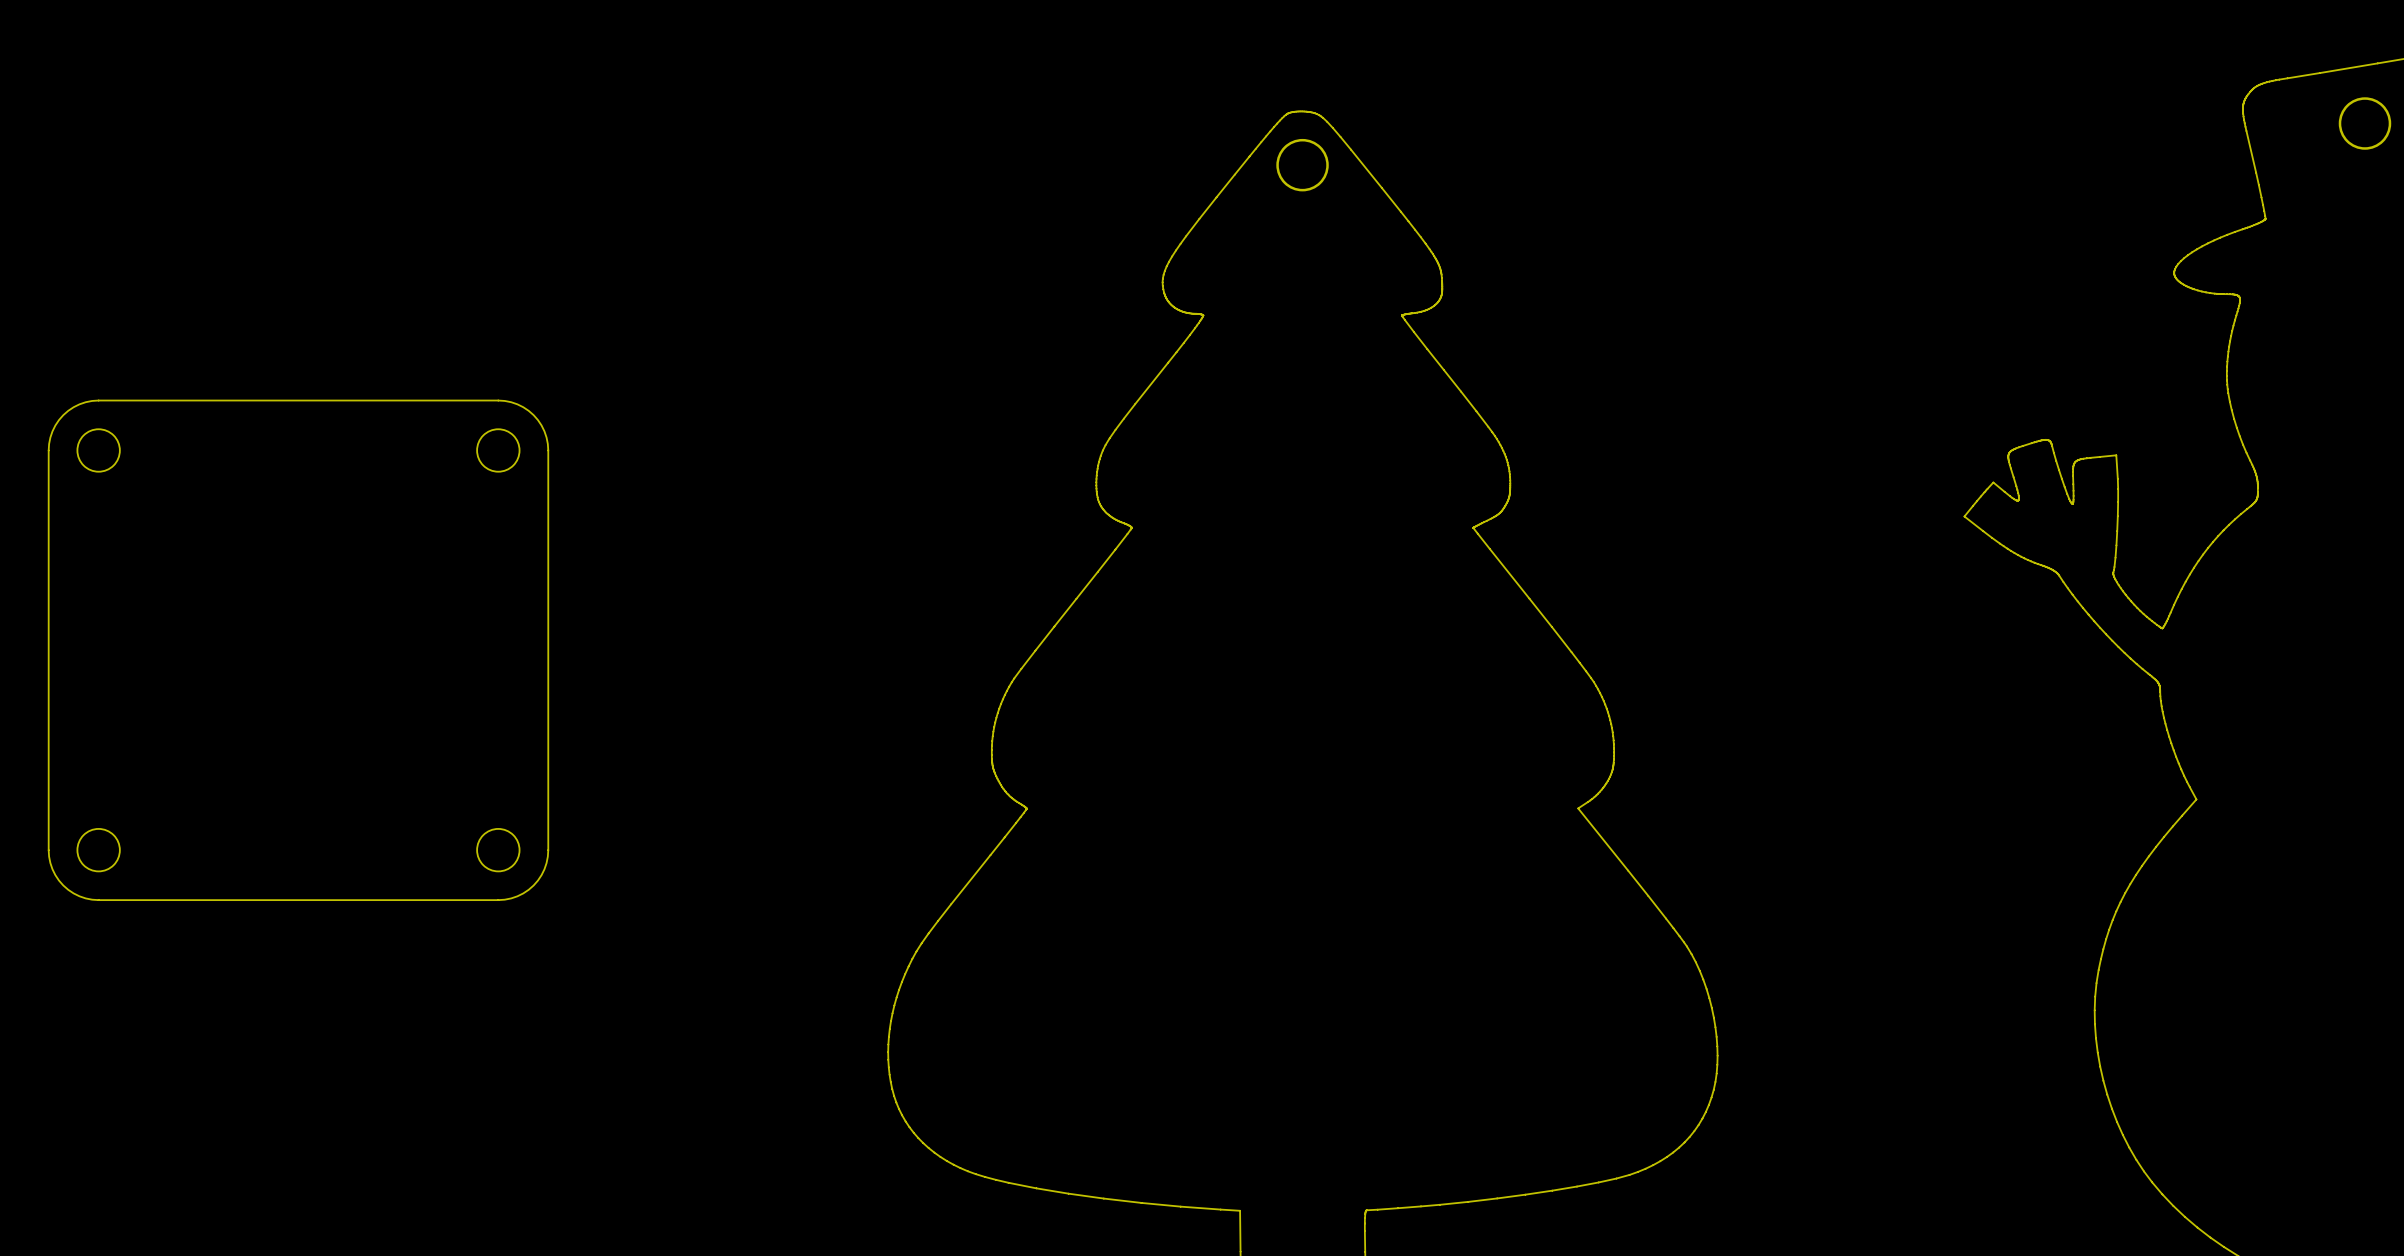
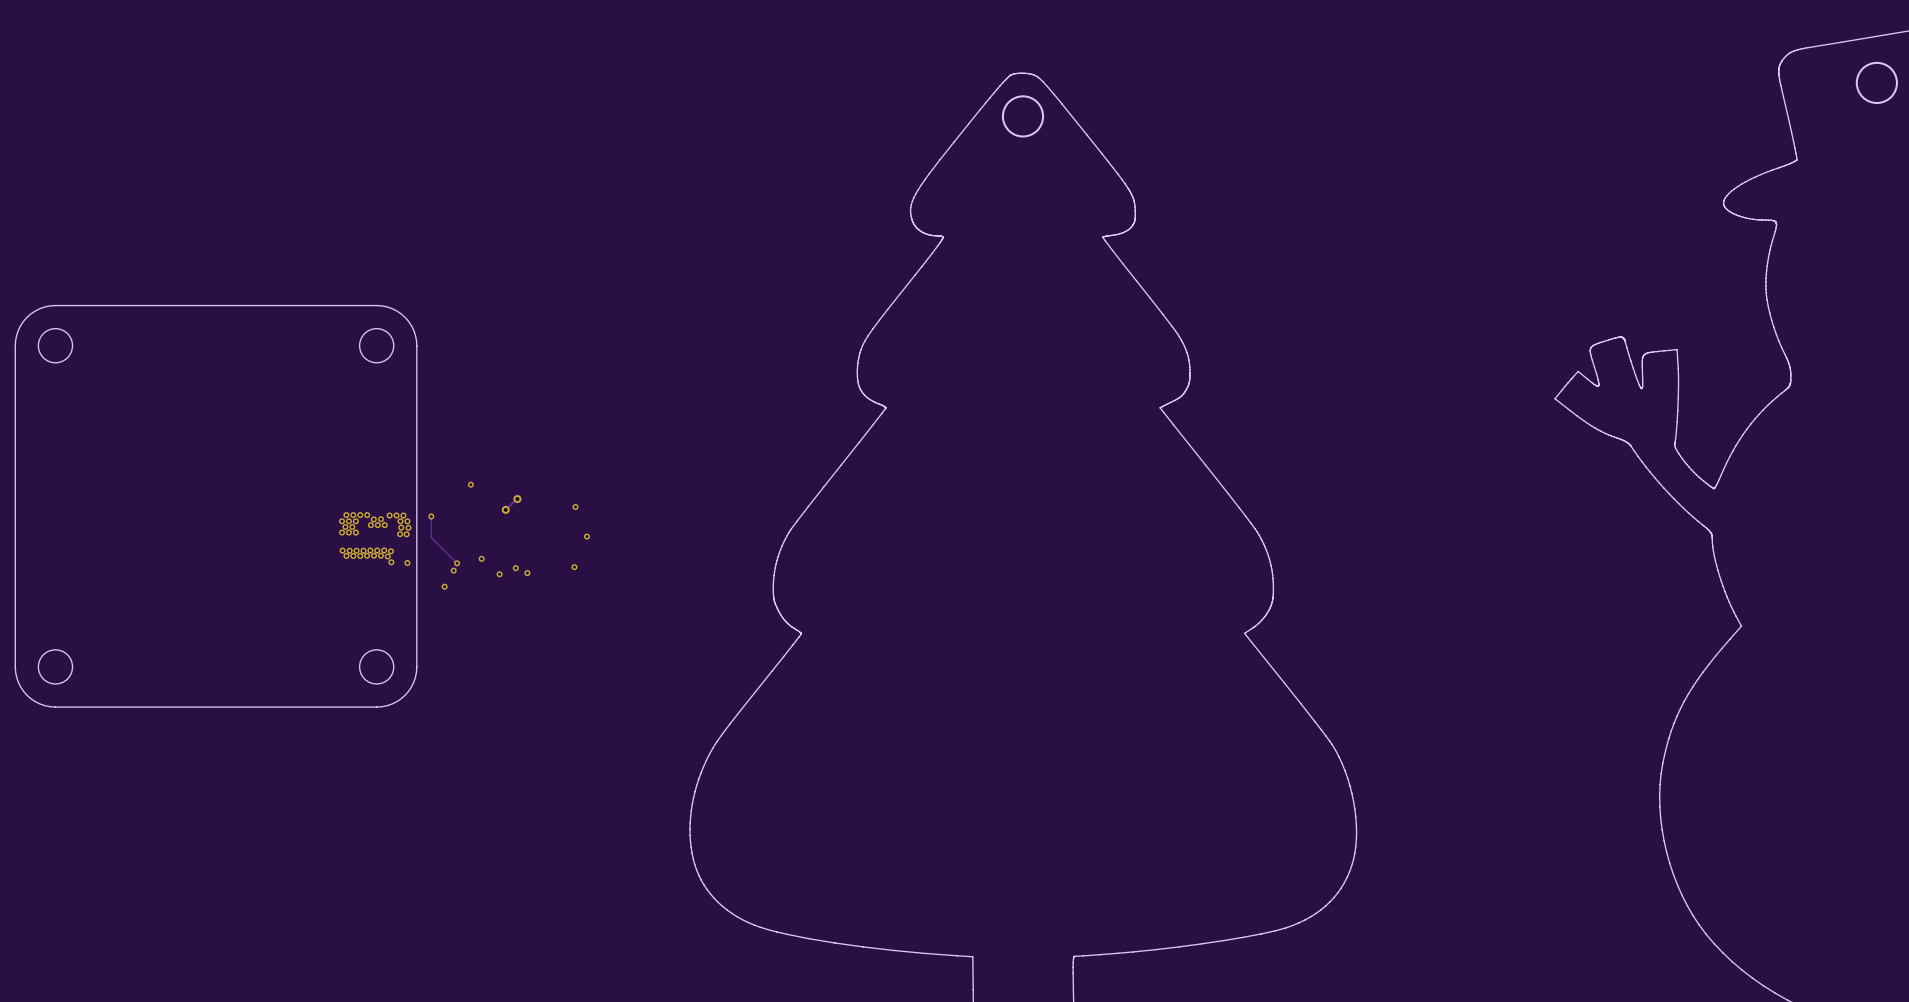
via: none -> (470, 484)
track: none -> (517, 499) (505, 509)
via: none -> (517, 499)
via: none -> (575, 506)
via: none -> (505, 509)
via: none -> (346, 515)
via: none -> (353, 515)
via: none -> (360, 515)
via: none -> (367, 515)
via: none -> (389, 515)
via: none -> (396, 515)
via: none -> (403, 515)
track: none -> (431, 516) (431, 537) (457, 563)
via: none -> (431, 516)
via: none -> (373, 519)
via: none -> (380, 519)
via: none -> (342, 521)
via: none -> (348, 521)
via: none -> (355, 521)
via: none -> (400, 521)
via: none -> (407, 521)
via: none -> (370, 525)
via: none -> (377, 525)
via: none -> (384, 525)
via: none -> (345, 526)
via: none -> (352, 526)
via: none -> (401, 527)
via: none -> (408, 527)
via: none -> (342, 532)
via: none -> (348, 532)
via: none -> (355, 532)
via: none -> (400, 534)
via: none -> (406, 534)
via: none -> (586, 536)
via: none -> (342, 550)
via: none -> (349, 550)
via: none -> (356, 550)
via: none -> (363, 550)
via: none -> (370, 550)
via: none -> (377, 550)
via: none -> (384, 550)
via: none -> (390, 551)
via: none -> (367, 555)
via: none -> (374, 555)
via: none -> (380, 555)
via: none -> (346, 555)
via: none -> (353, 555)
via: none -> (360, 555)
via: none -> (387, 556)
via: none -> (481, 558)
via: none -> (391, 562)
via: none -> (407, 563)
via: none -> (457, 563)
via: none -> (574, 567)
via: none -> (515, 568)
via: none -> (453, 570)
via: none -> (527, 573)
via: none -> (499, 574)
via: none -> (444, 586)

